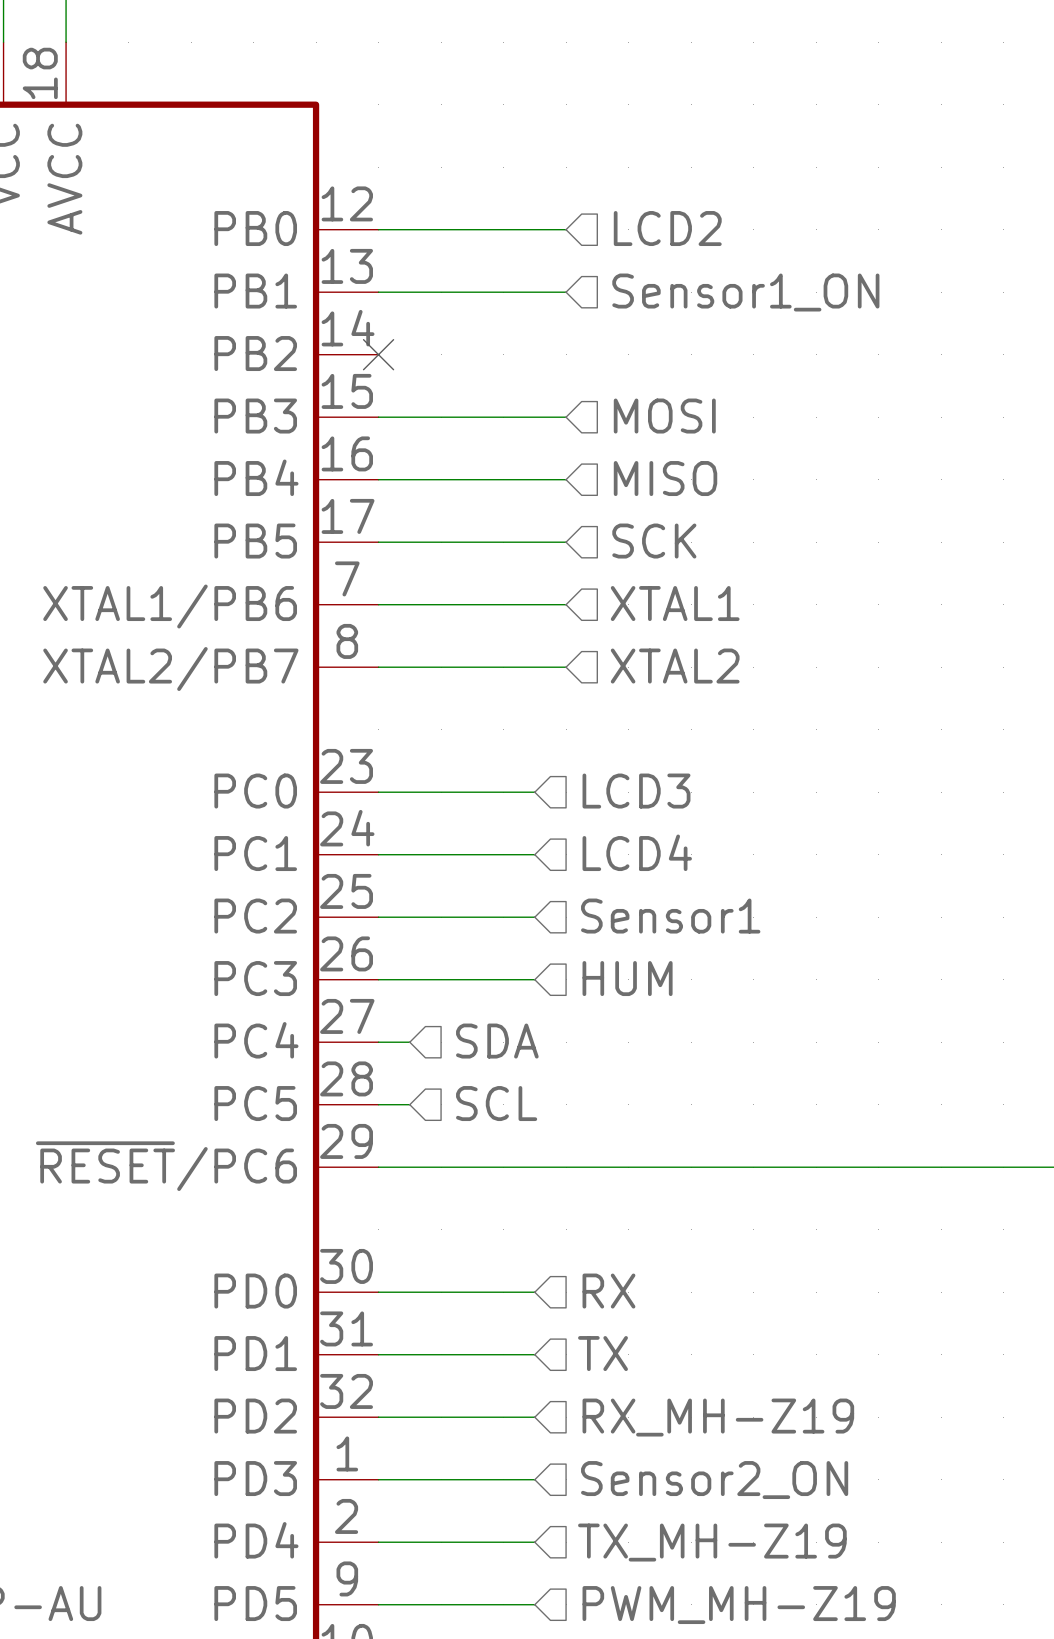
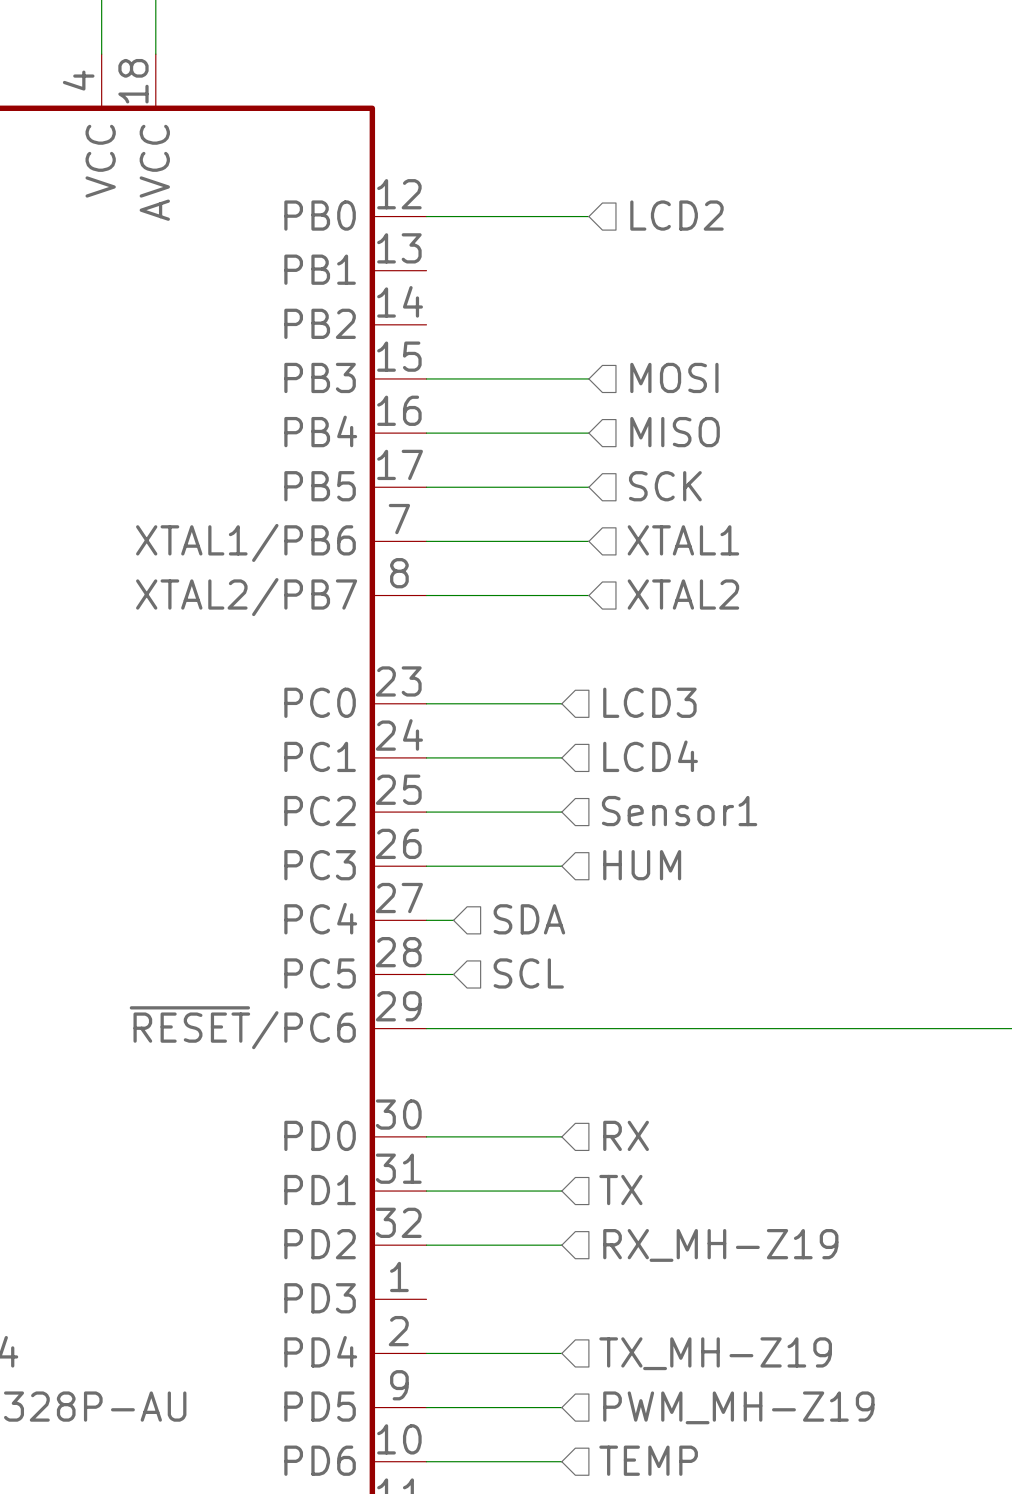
wire: (378, 292) (566, 292) -> none
hierarchical label: Sensor1_ON (745, 292) -> none
no-connect mark: (378, 354) -> none
wire: (378, 1479) (534, 1479) -> none
hierarchical label: Sensor2_ON (714, 1480) -> none

